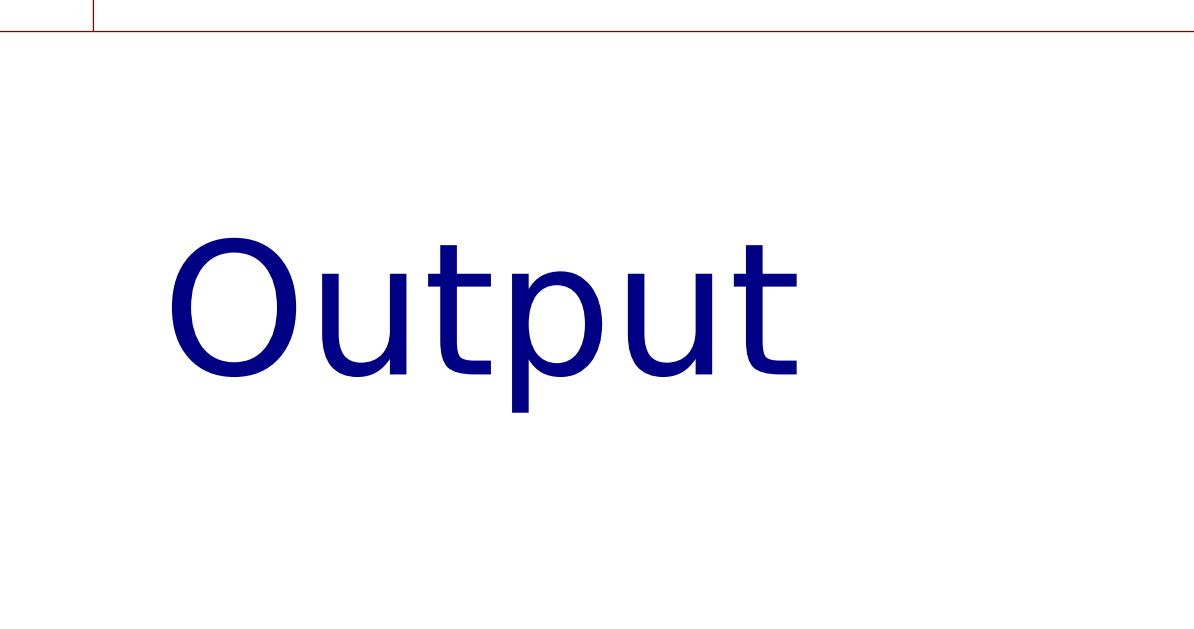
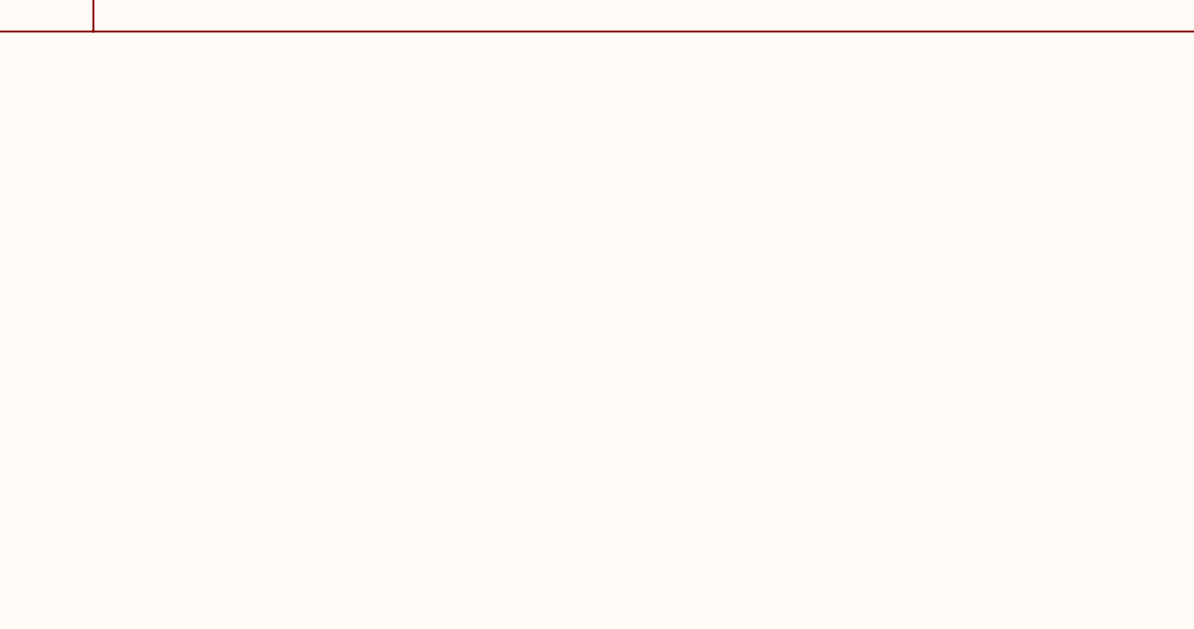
text: Output (484, 325) -> none

